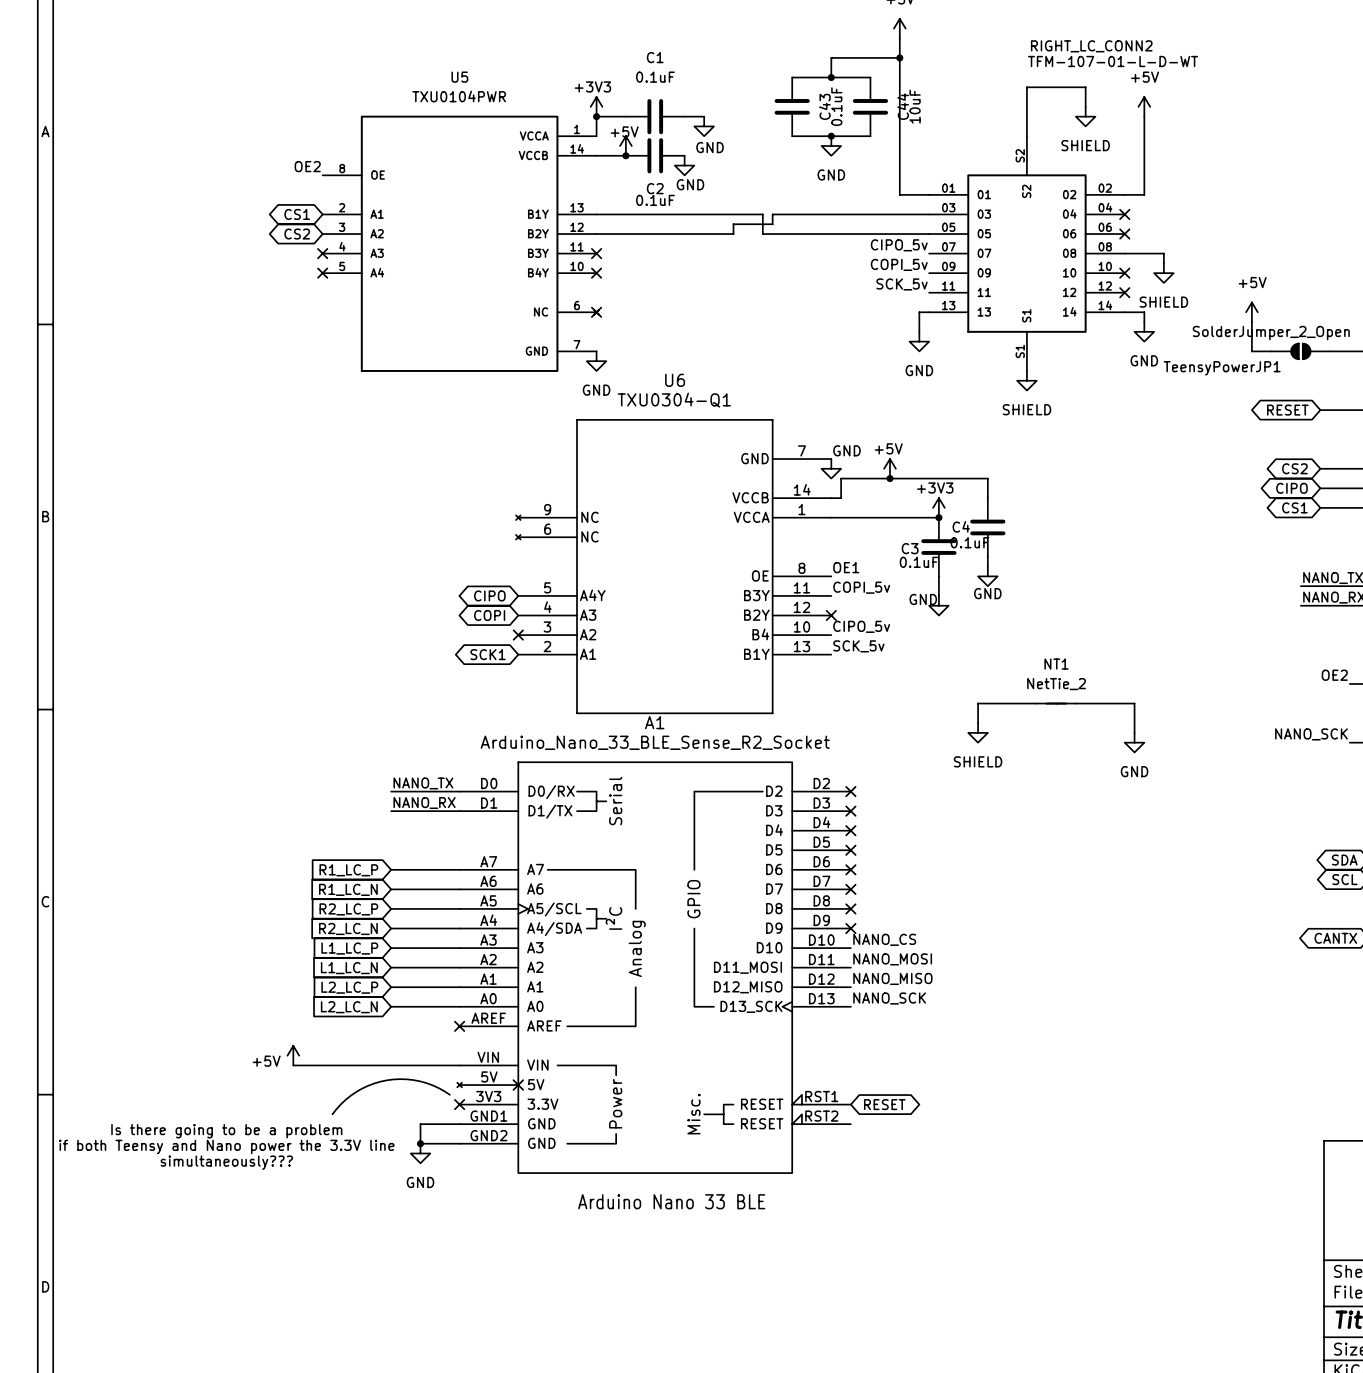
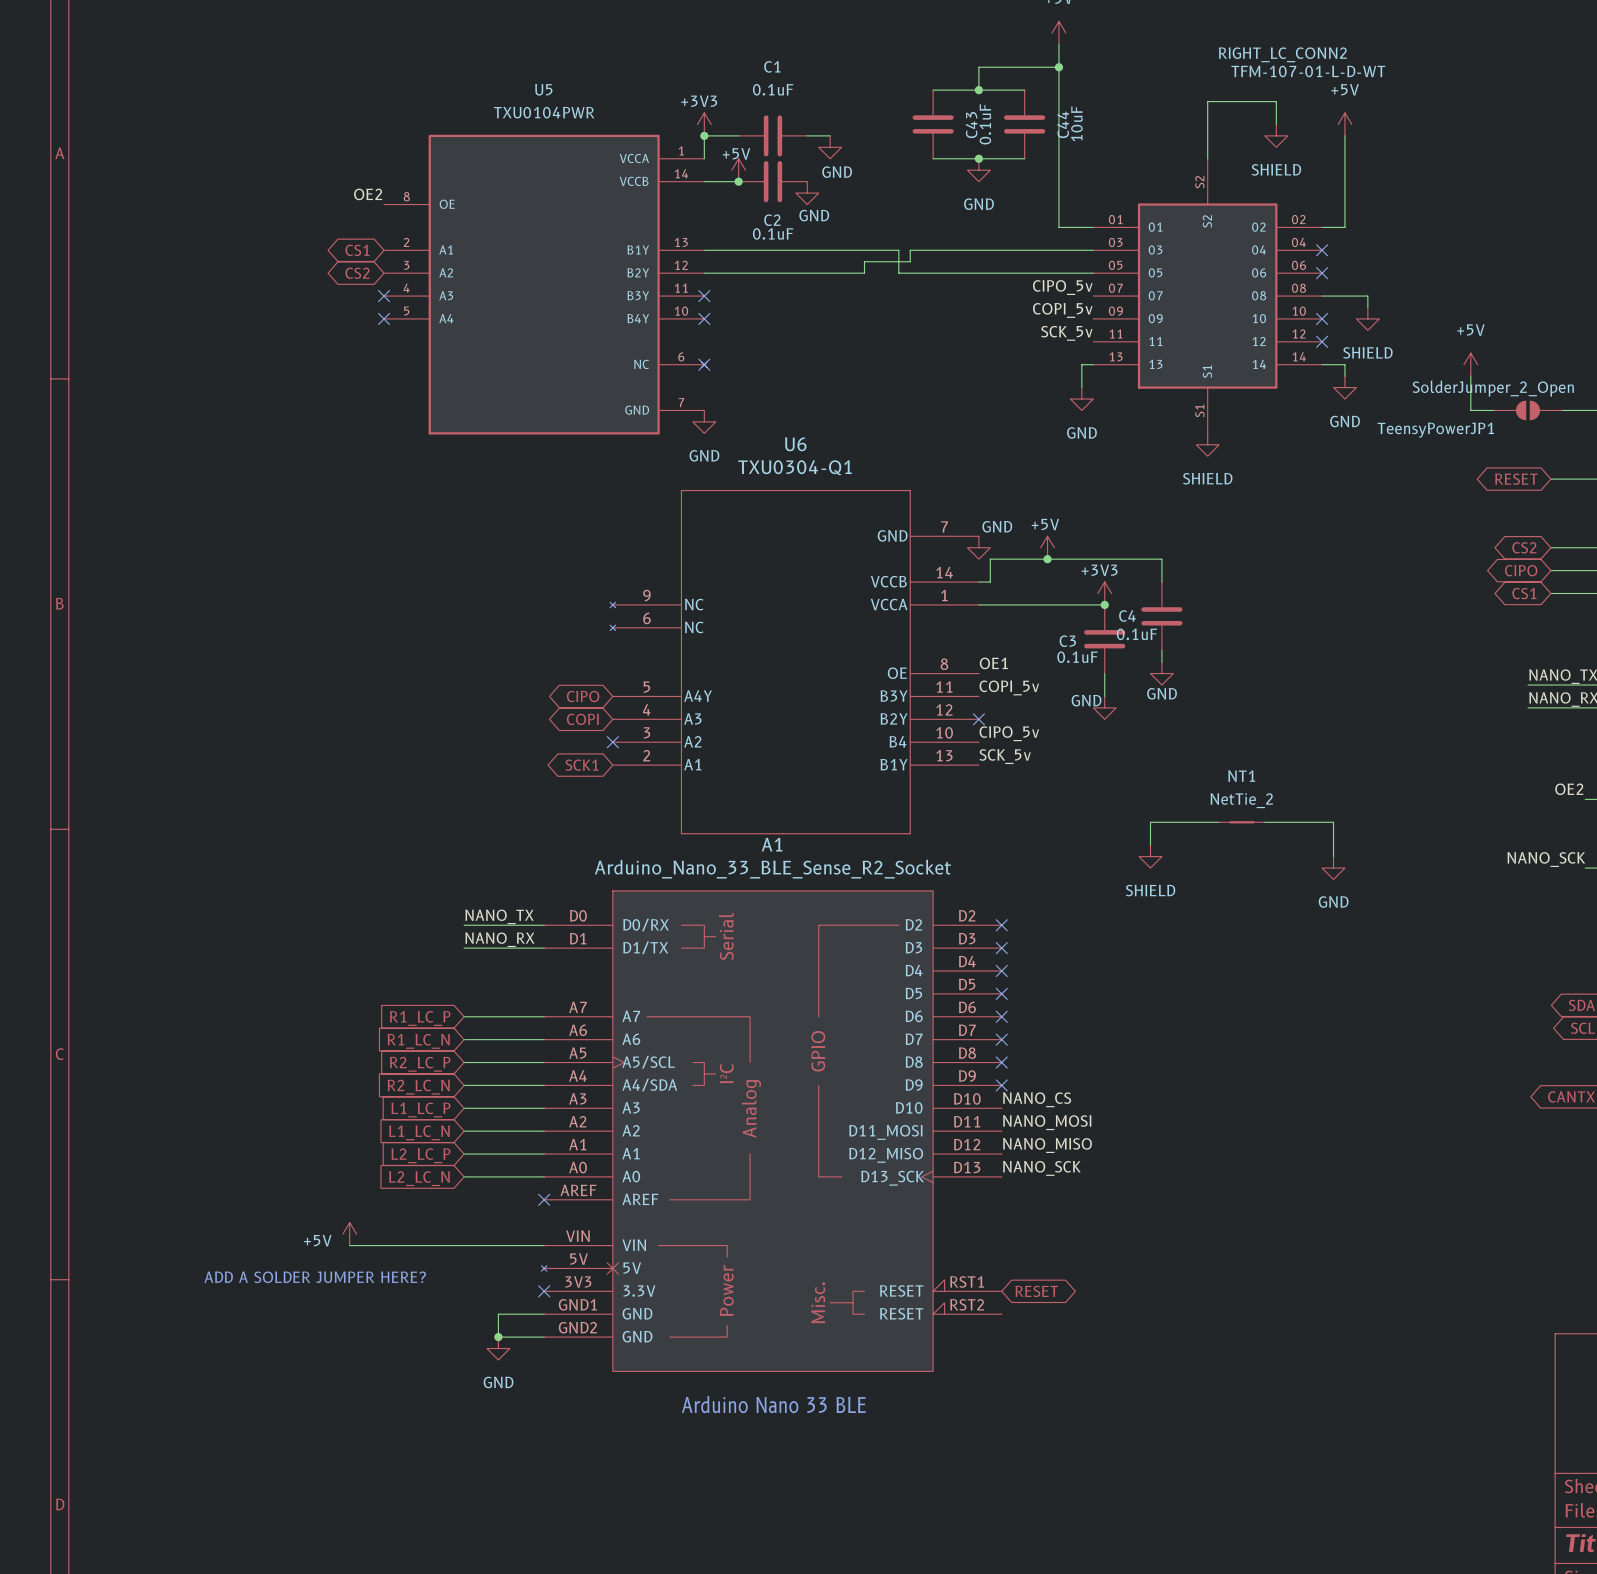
text: none -> ADD A SOLDER JUMPER HERE? (315, 1277)
line: (449, 1094) (432, 1085) (419, 1081) (400, 1079) (387, 1080) (368, 1085) (356, 1091) (345, 1099) (332, 1114) -> none
text: Is there going to be a problem (226, 1131) -> none
text: if both Teensy and Nano power the 3.3V line (226, 1146) -> none
text: simultaneously??? (226, 1162) -> none

